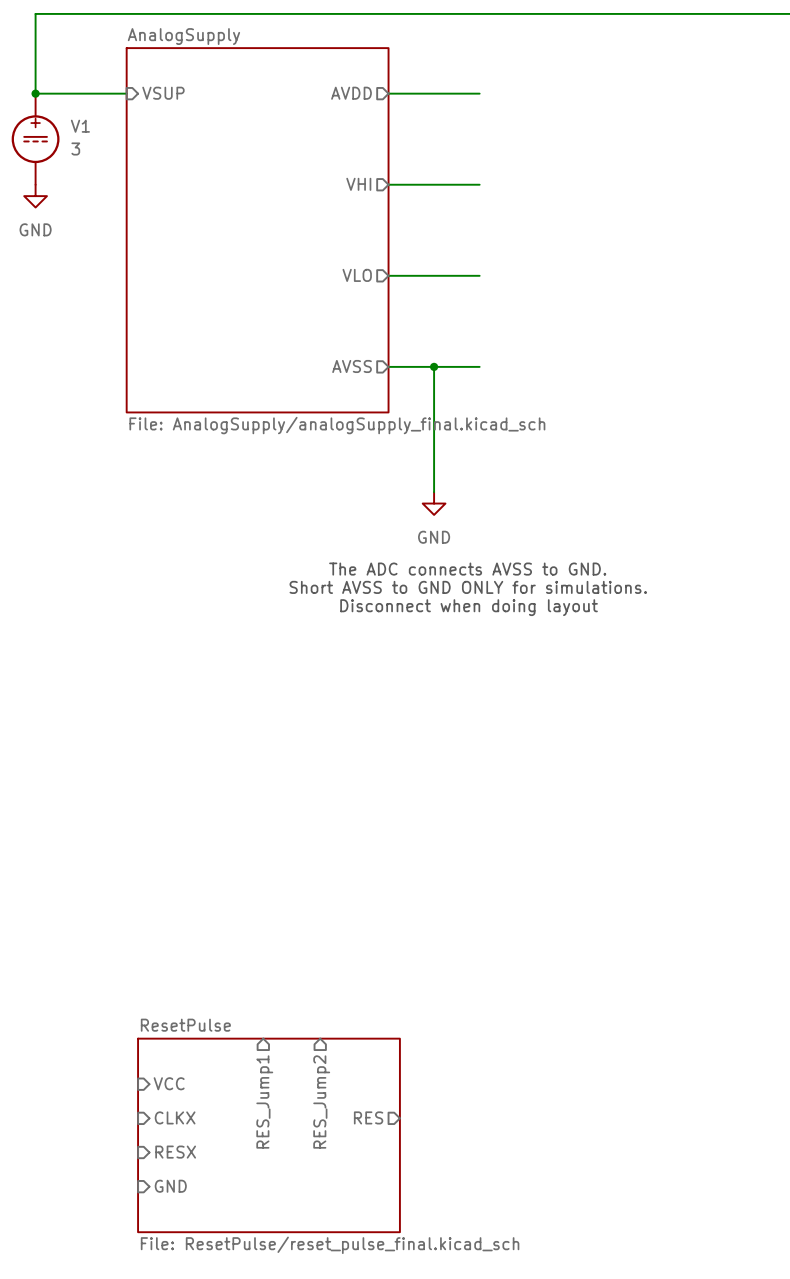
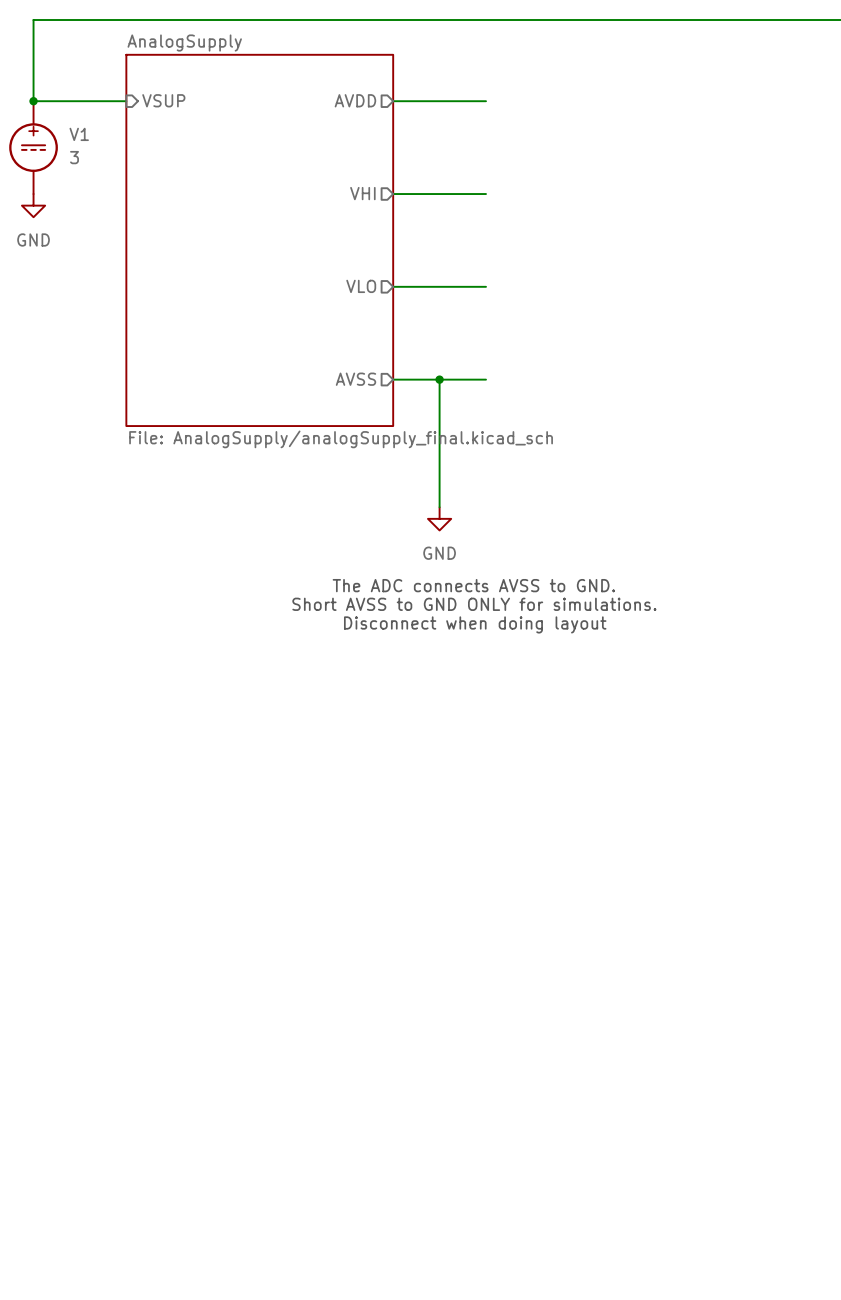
sheet pin: VCC (169, 1083) -> none
sheet pin: RES_Jump1 (264, 1101) -> none
sheet pin: RES_Jump2 (321, 1101) -> none
sheet pin: CLKX (175, 1117) -> none
sheet pin: RES (368, 1117) -> none
sheet ResetPulse: File: ResetPulse/reset_pulse_final.kicad_sch (268, 1135) -> none
sheet pin: RESX (175, 1152) -> none
sheet pin: GND (170, 1186) -> none

